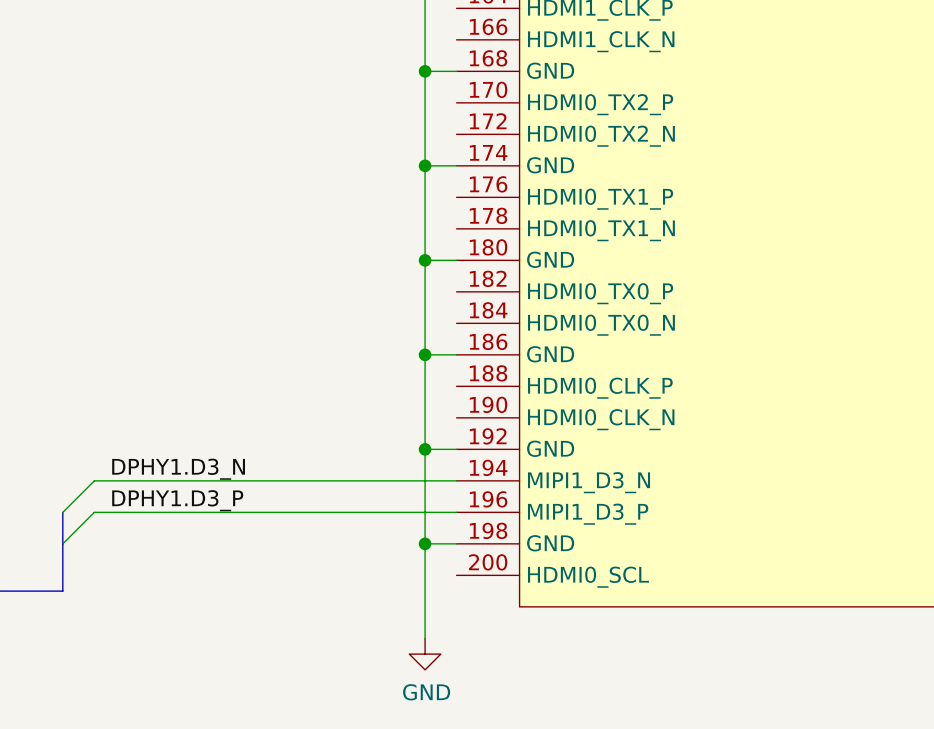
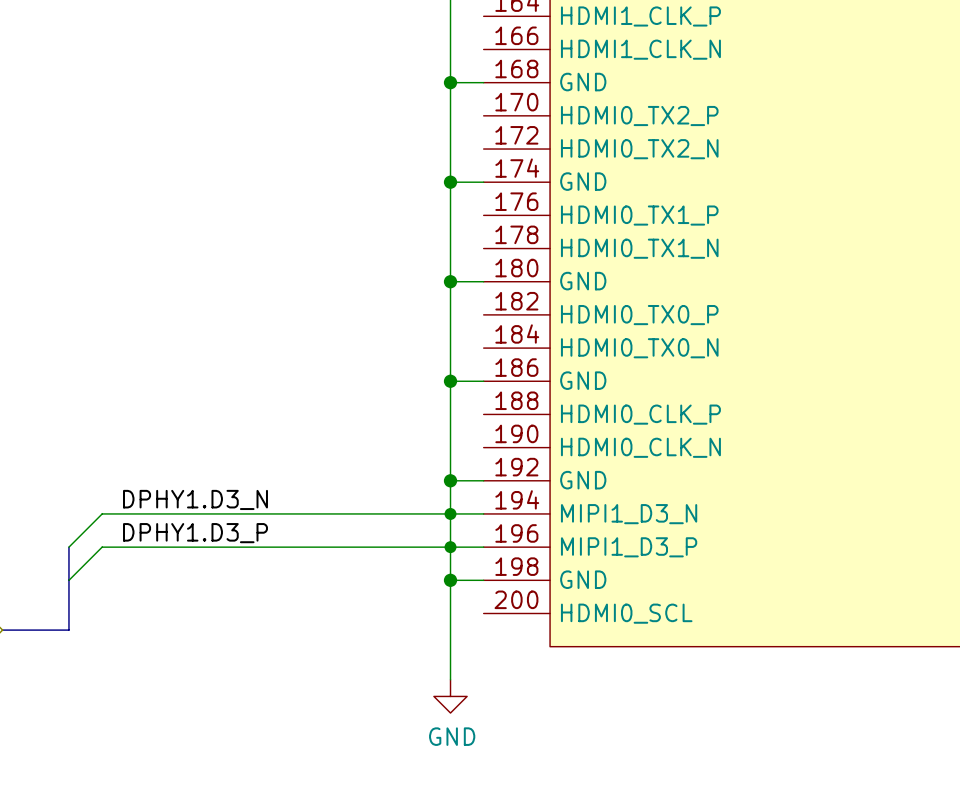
junction: none -> (450, 513)
junction: none -> (450, 547)

